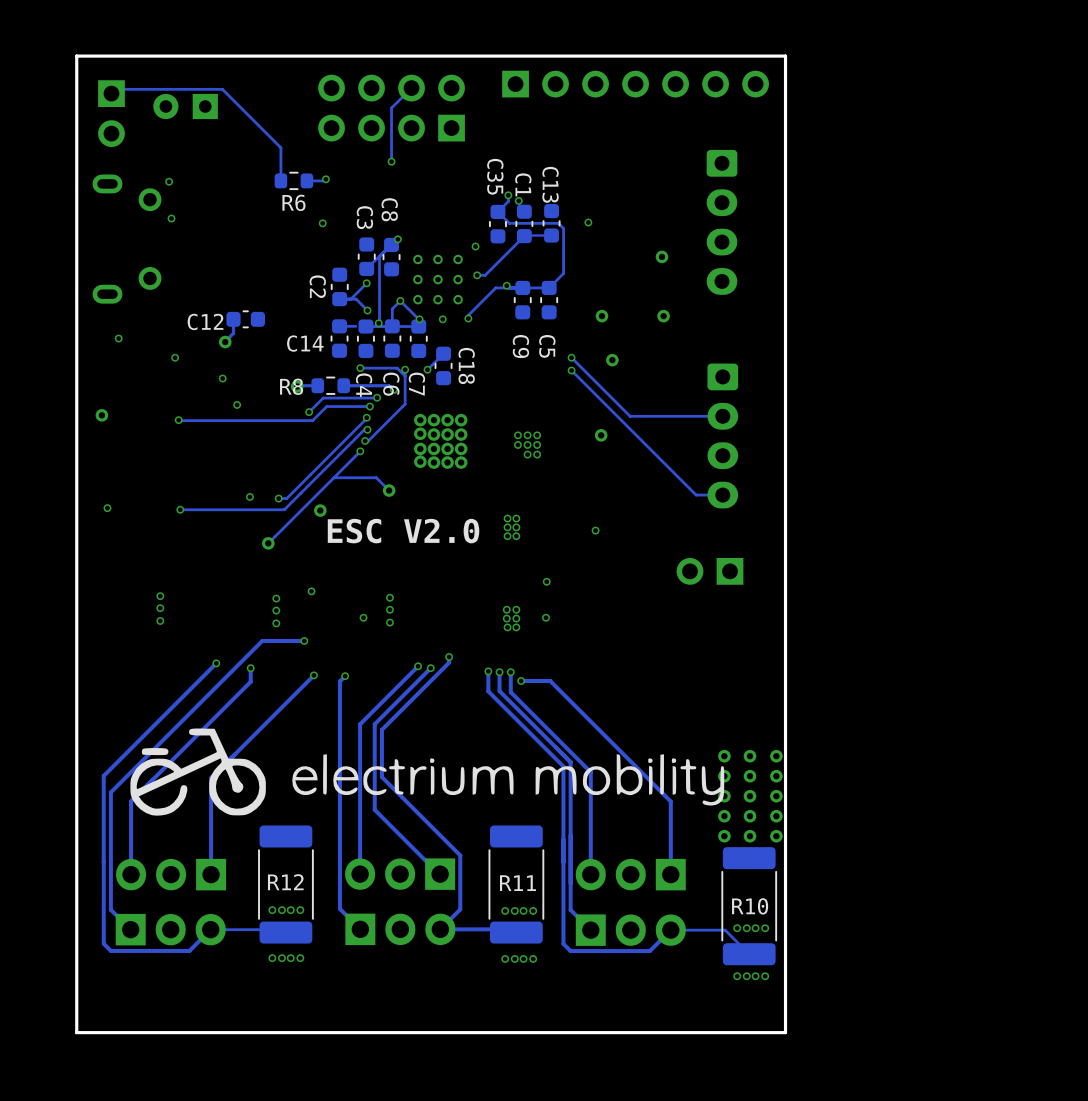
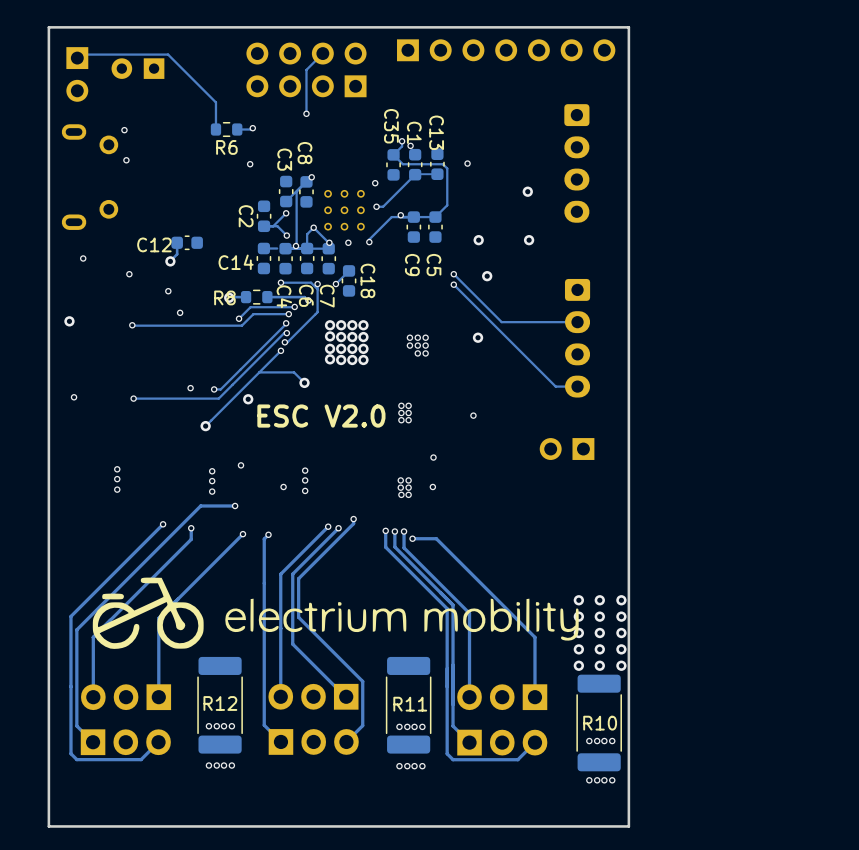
track: (283, 929) (210, 929) -> none
track: (513, 929) (440, 929) -> none
track: (670, 930) (725, 930) (749, 954) -> none

